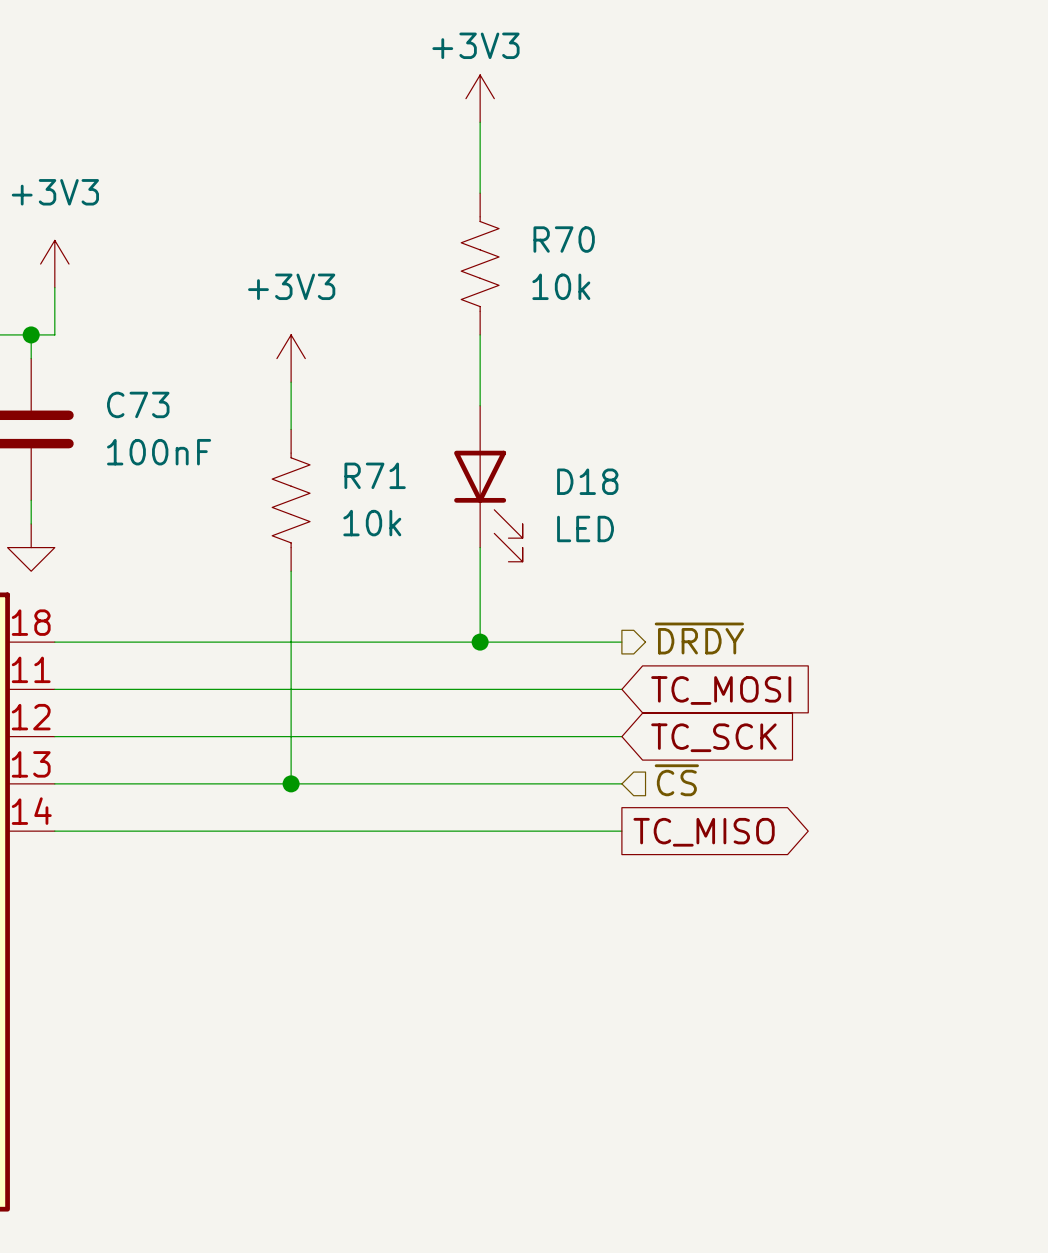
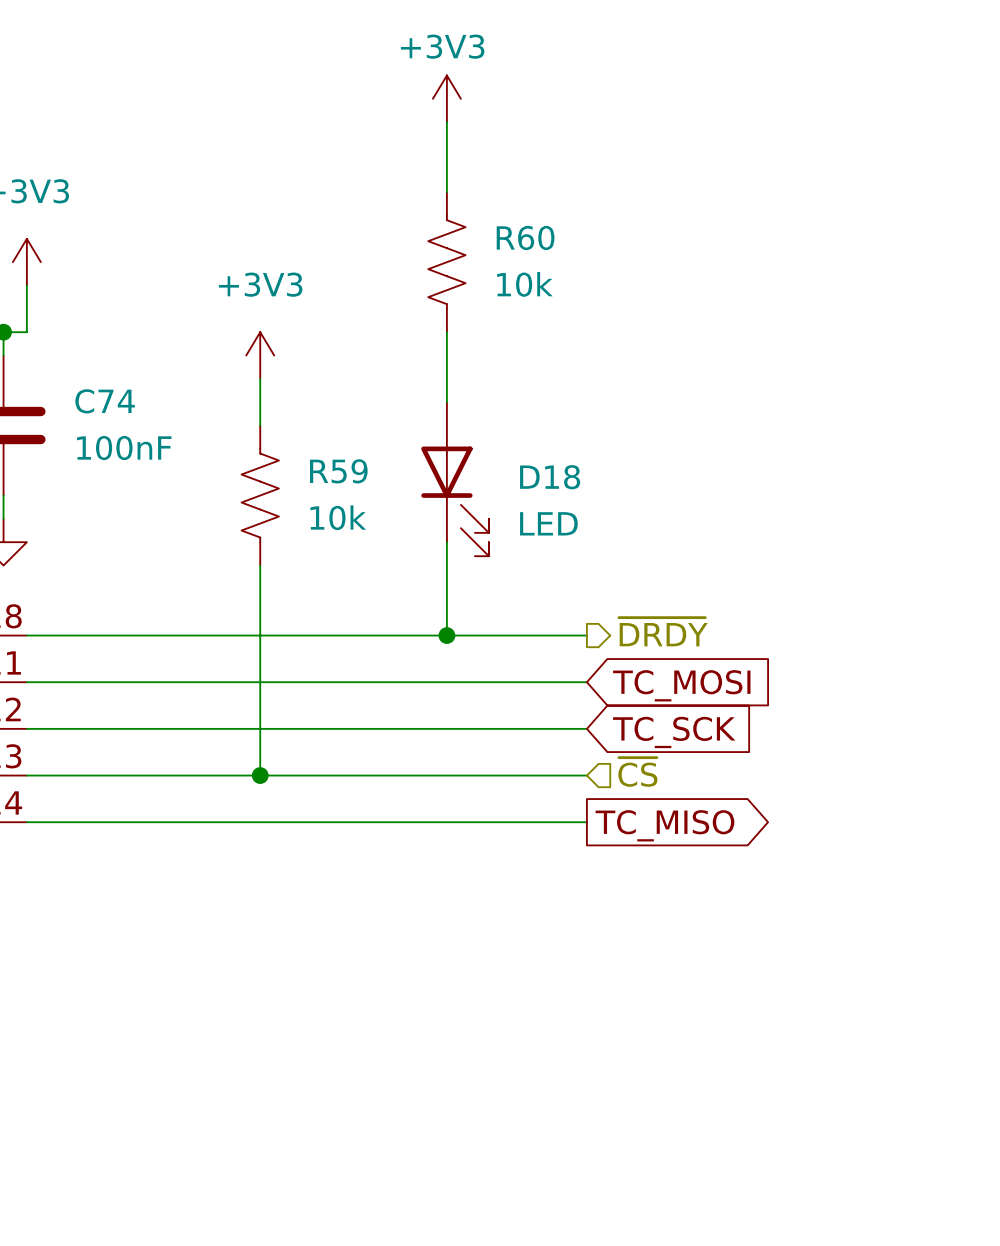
R70 name: R70 (564, 239) -> R60 (525, 237)
C73 name: C73 (138, 404) -> C74 (105, 401)
R71 name: R71 (375, 475) -> R59 (338, 471)

